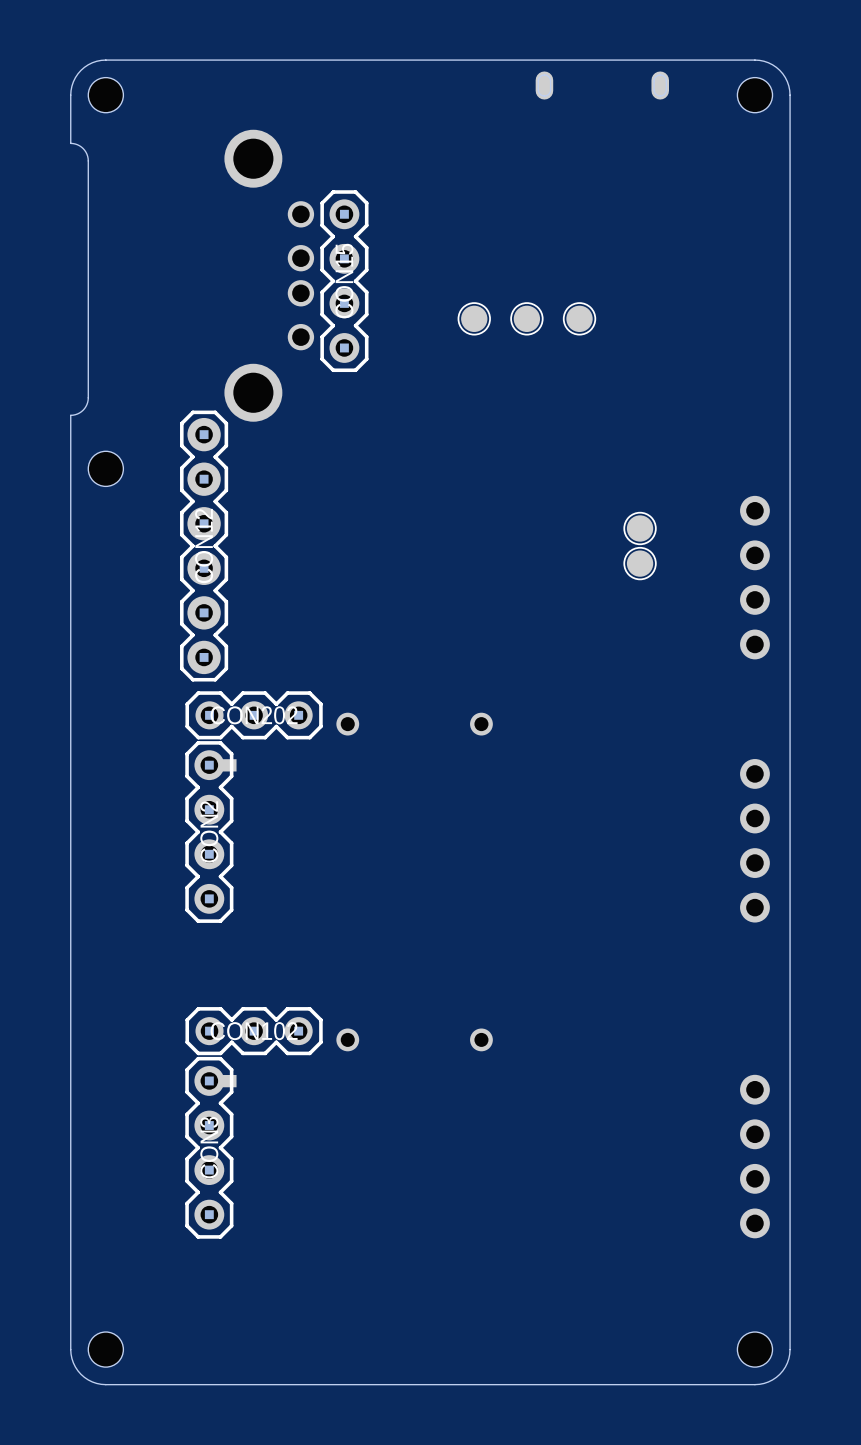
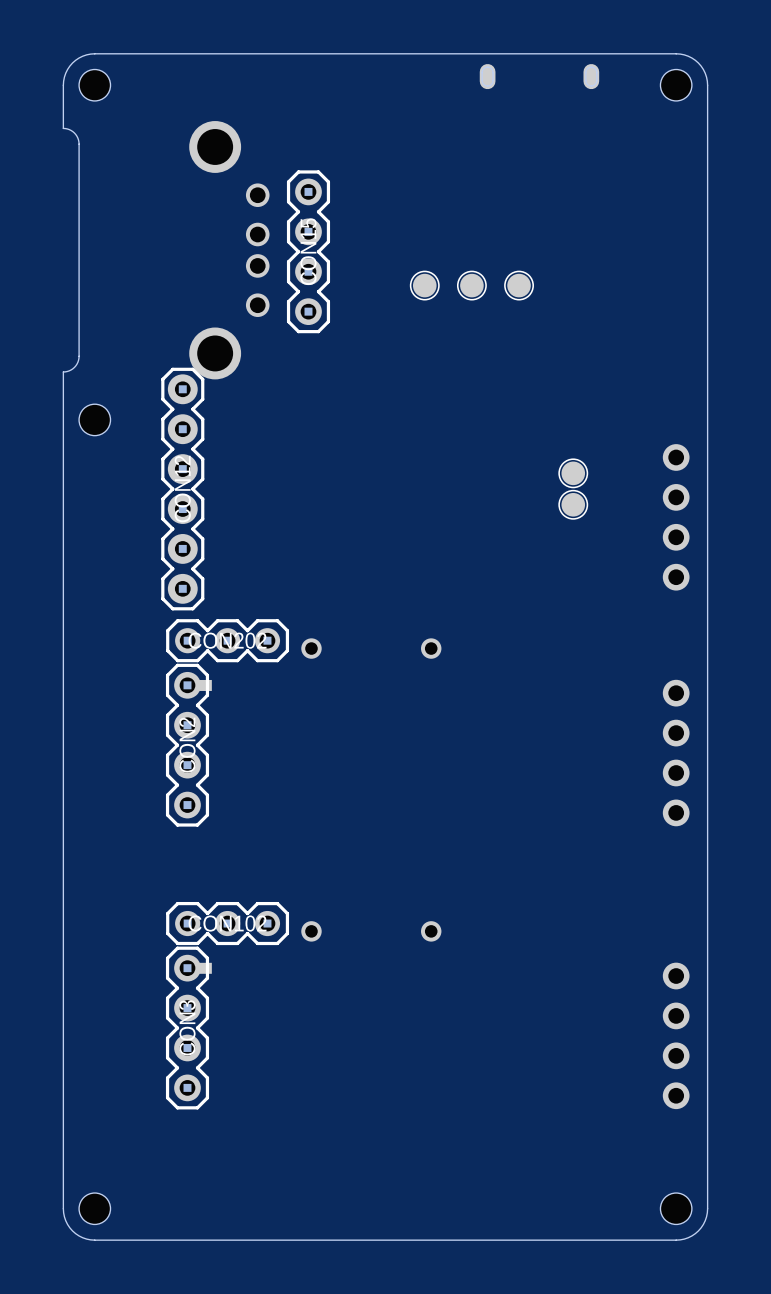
part footprint: [224, 129, 315, 422] -> [189, 121, 270, 380]

